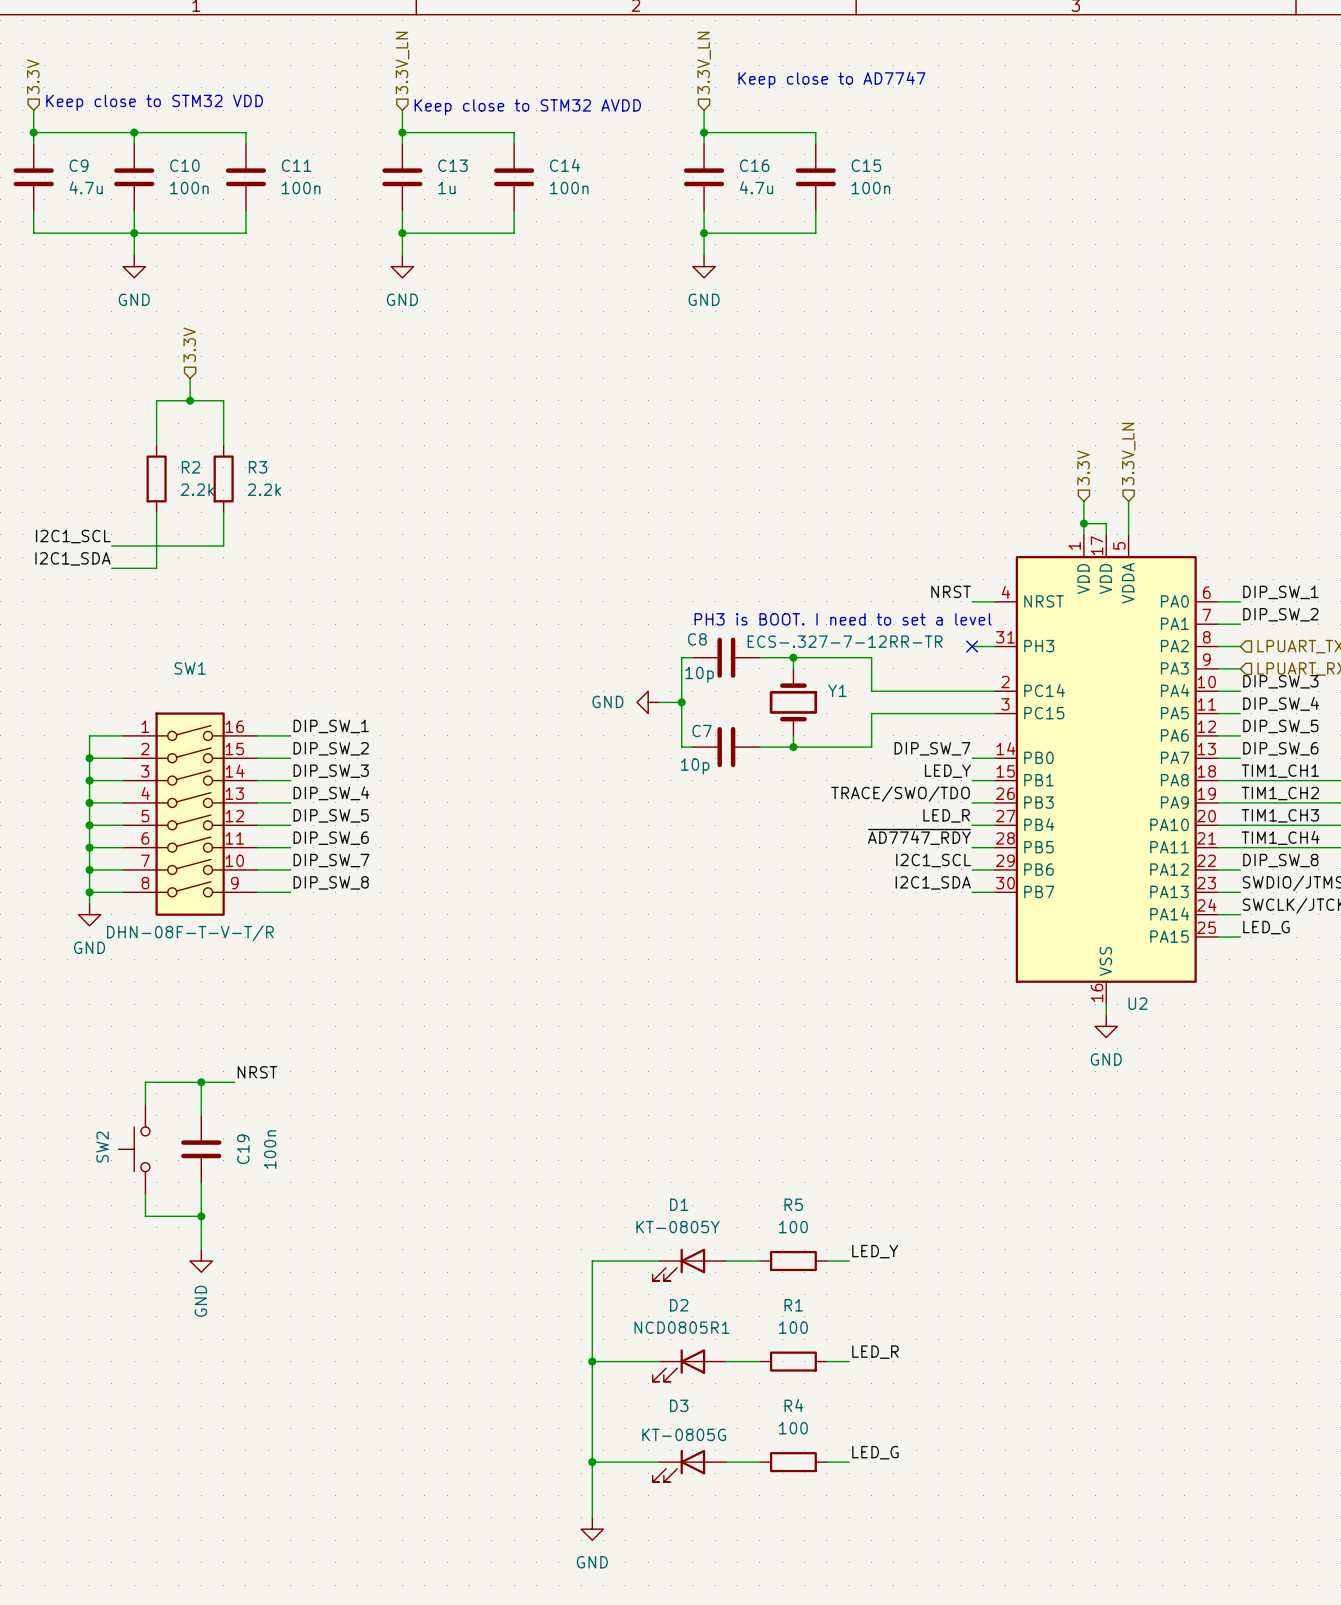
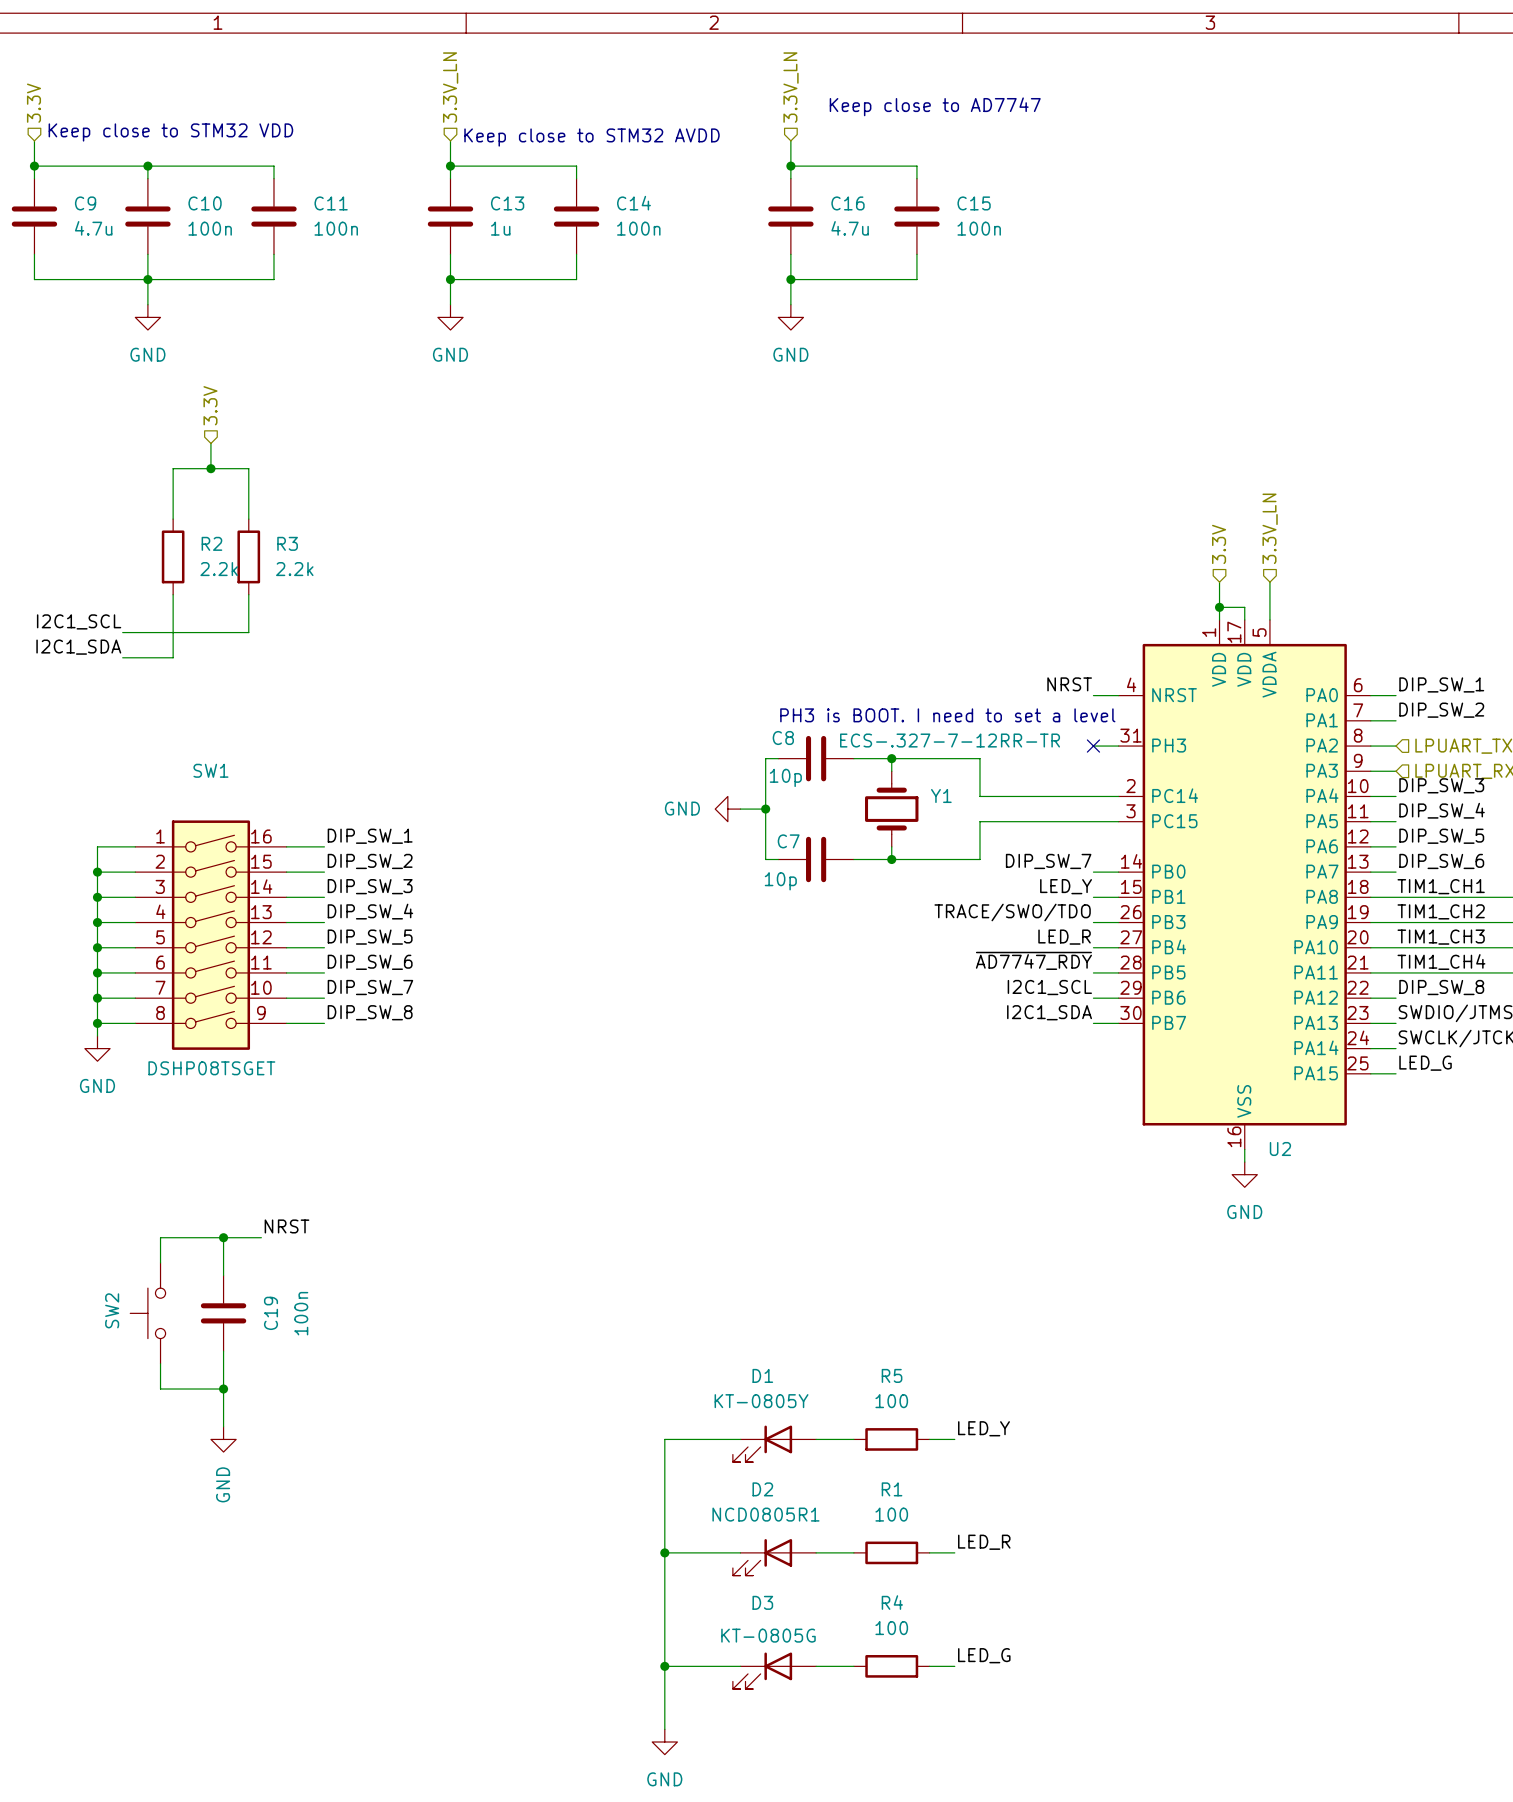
SW1 text: DHN-08F-T-V-T/R (190, 933) -> DSHP08TSGET (211, 1068)

